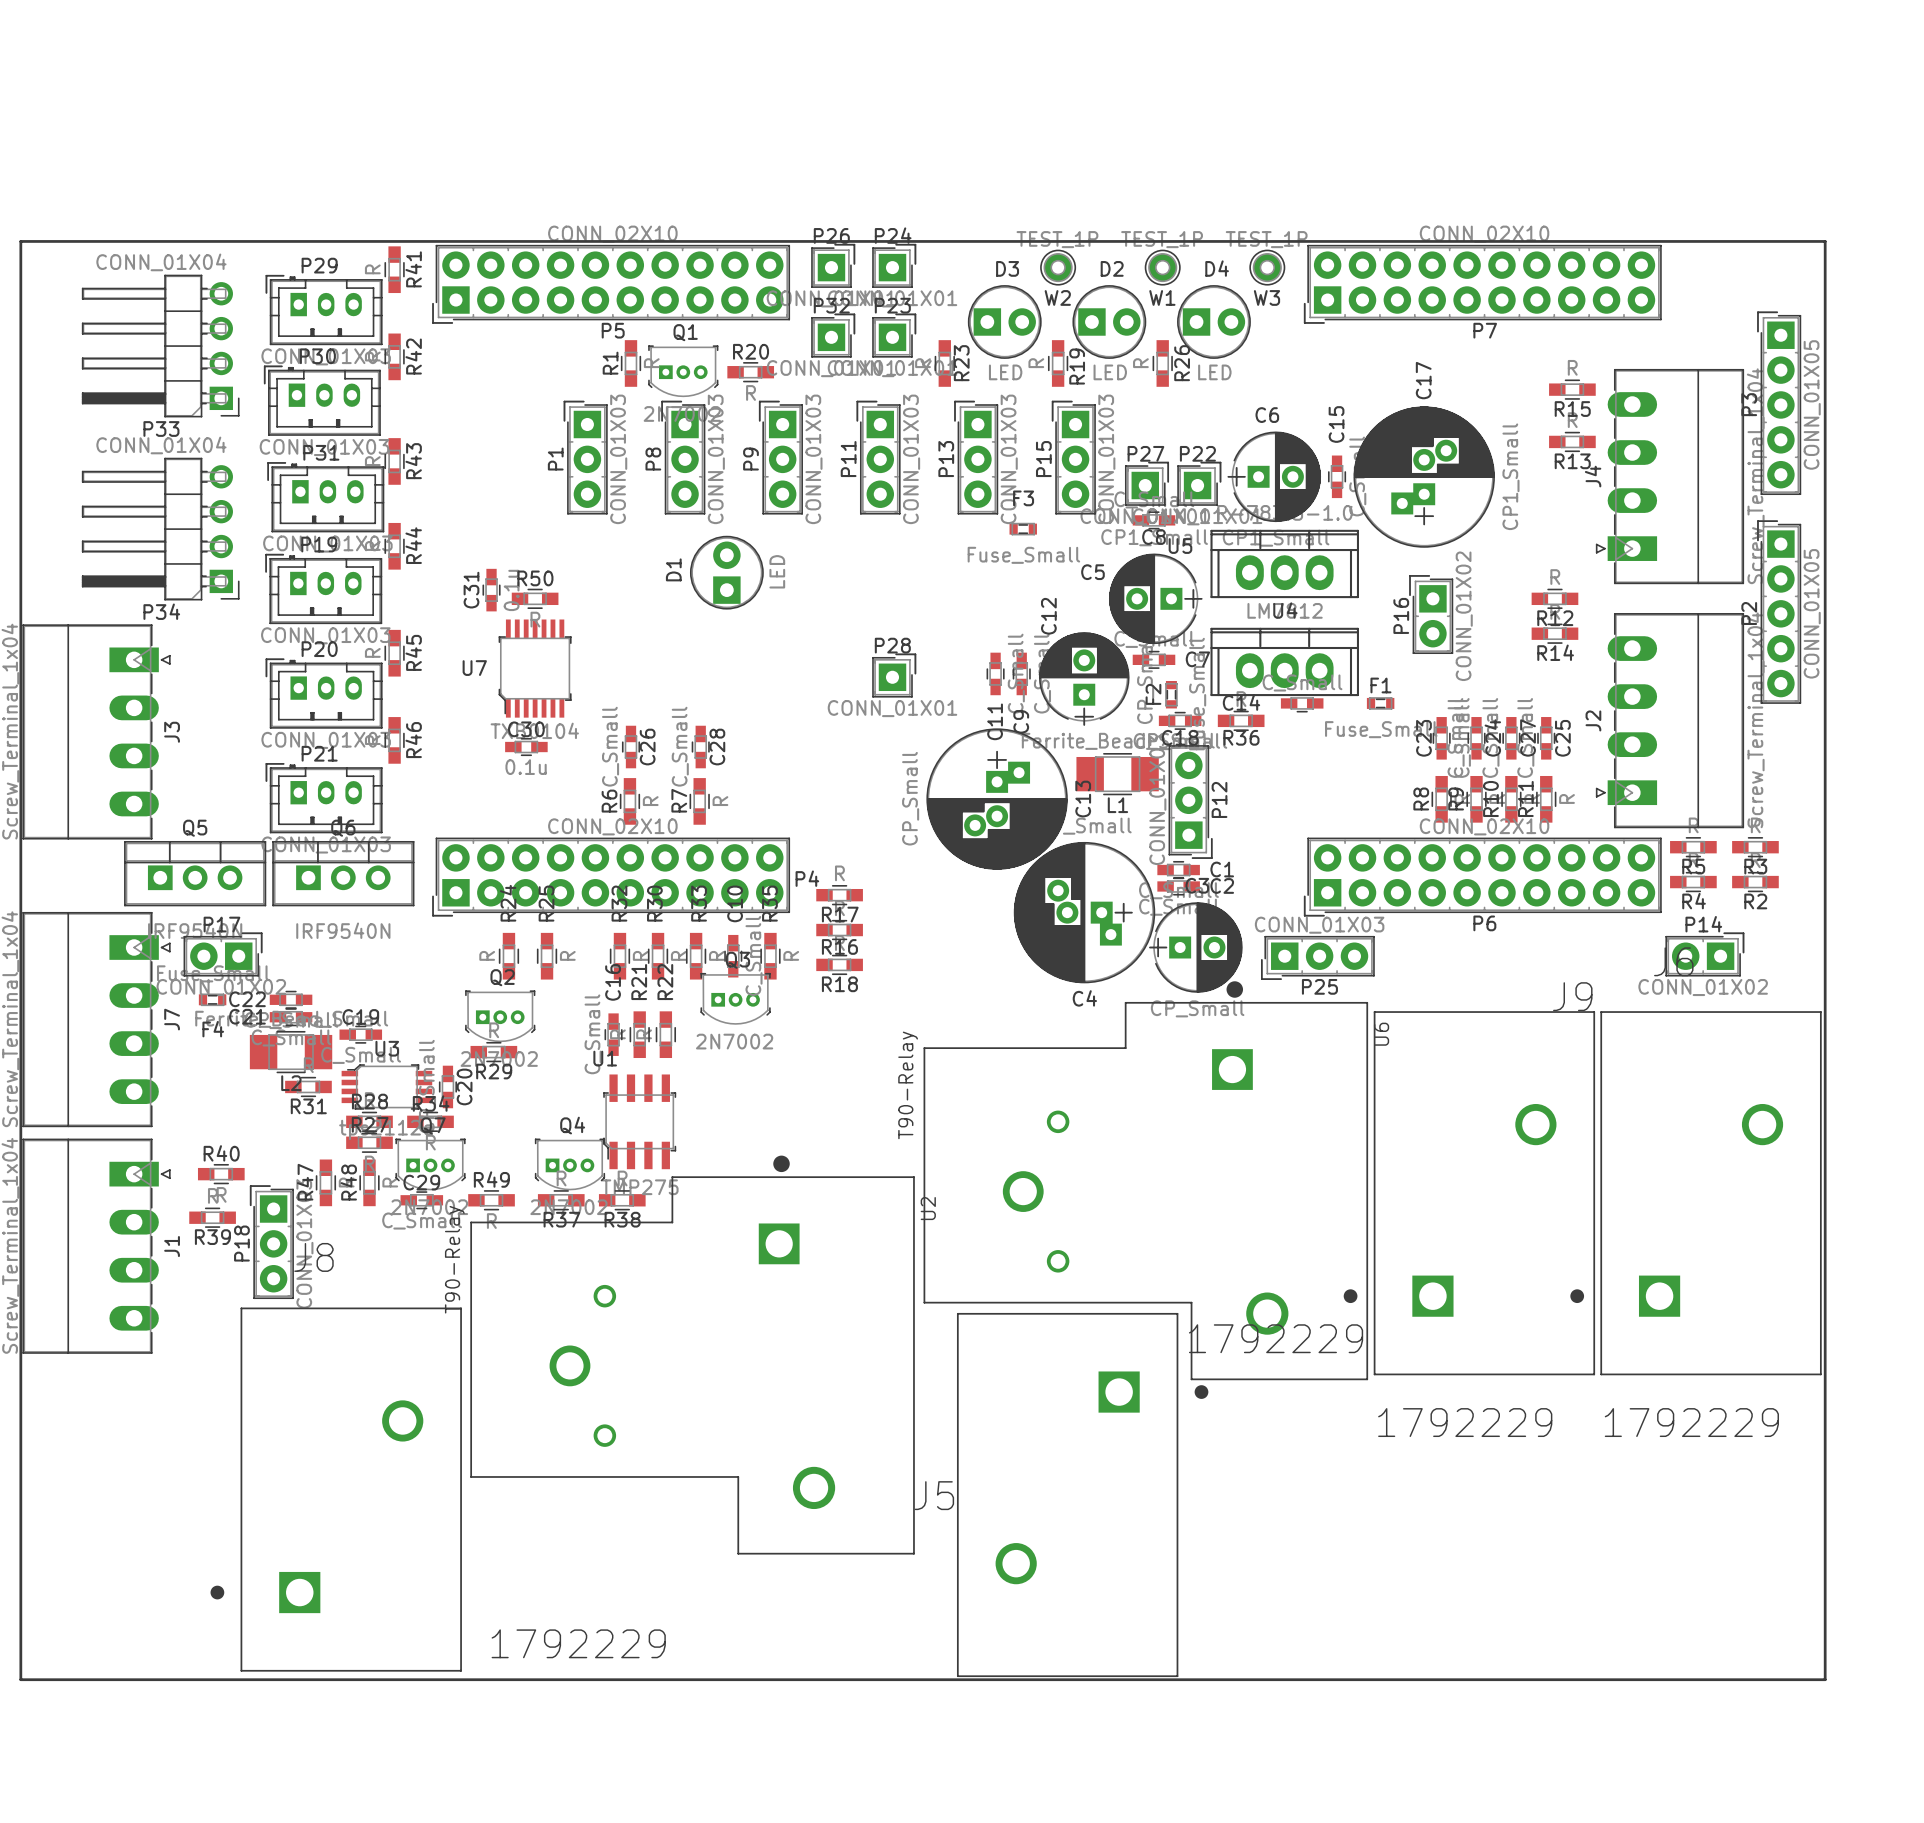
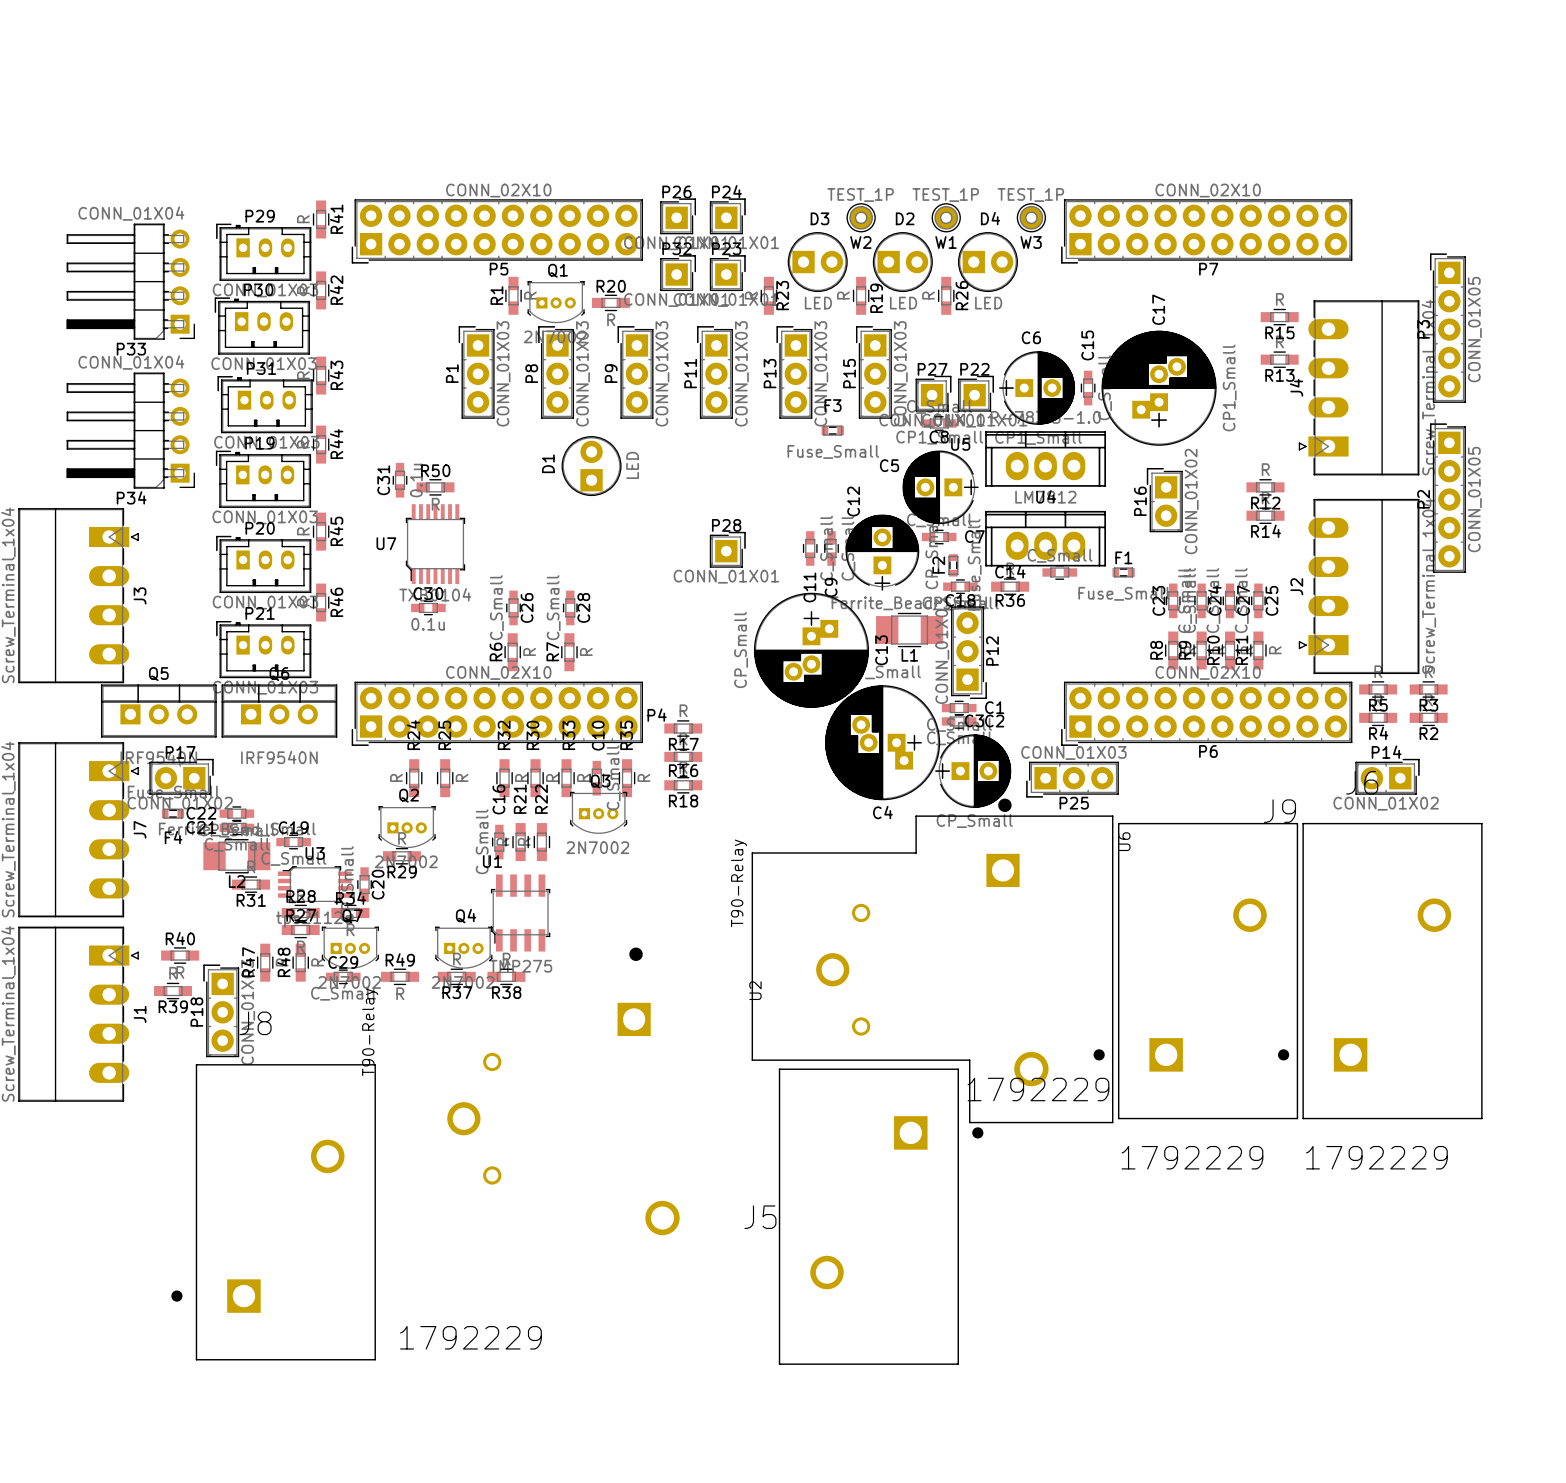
line: (20, 241) (20, 1679) (1825, 1679) (1825, 241) (20, 241) -> none
U2 footprint: [470, 1155, 915, 1555] -> [447, 947, 680, 1236]

